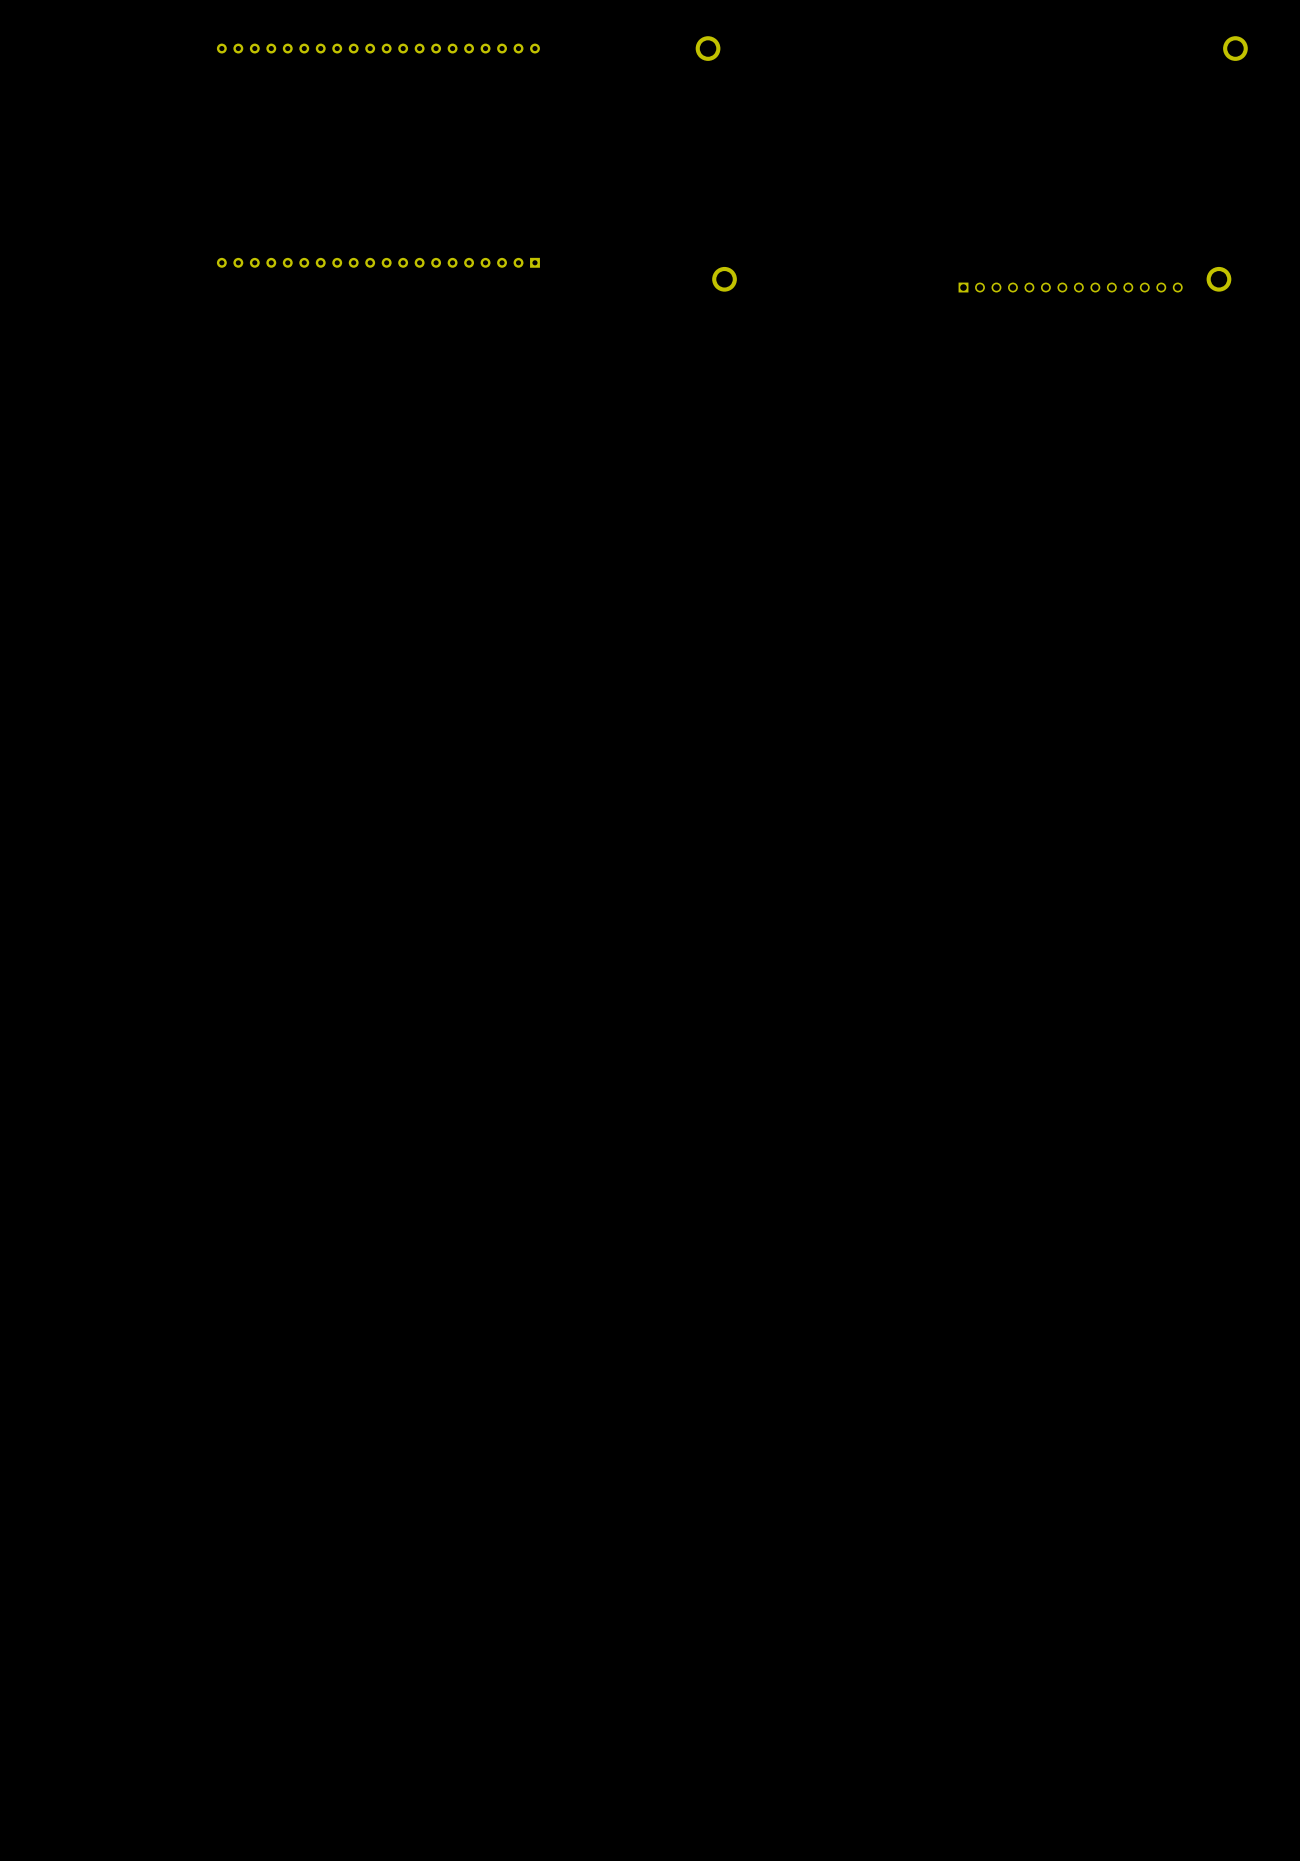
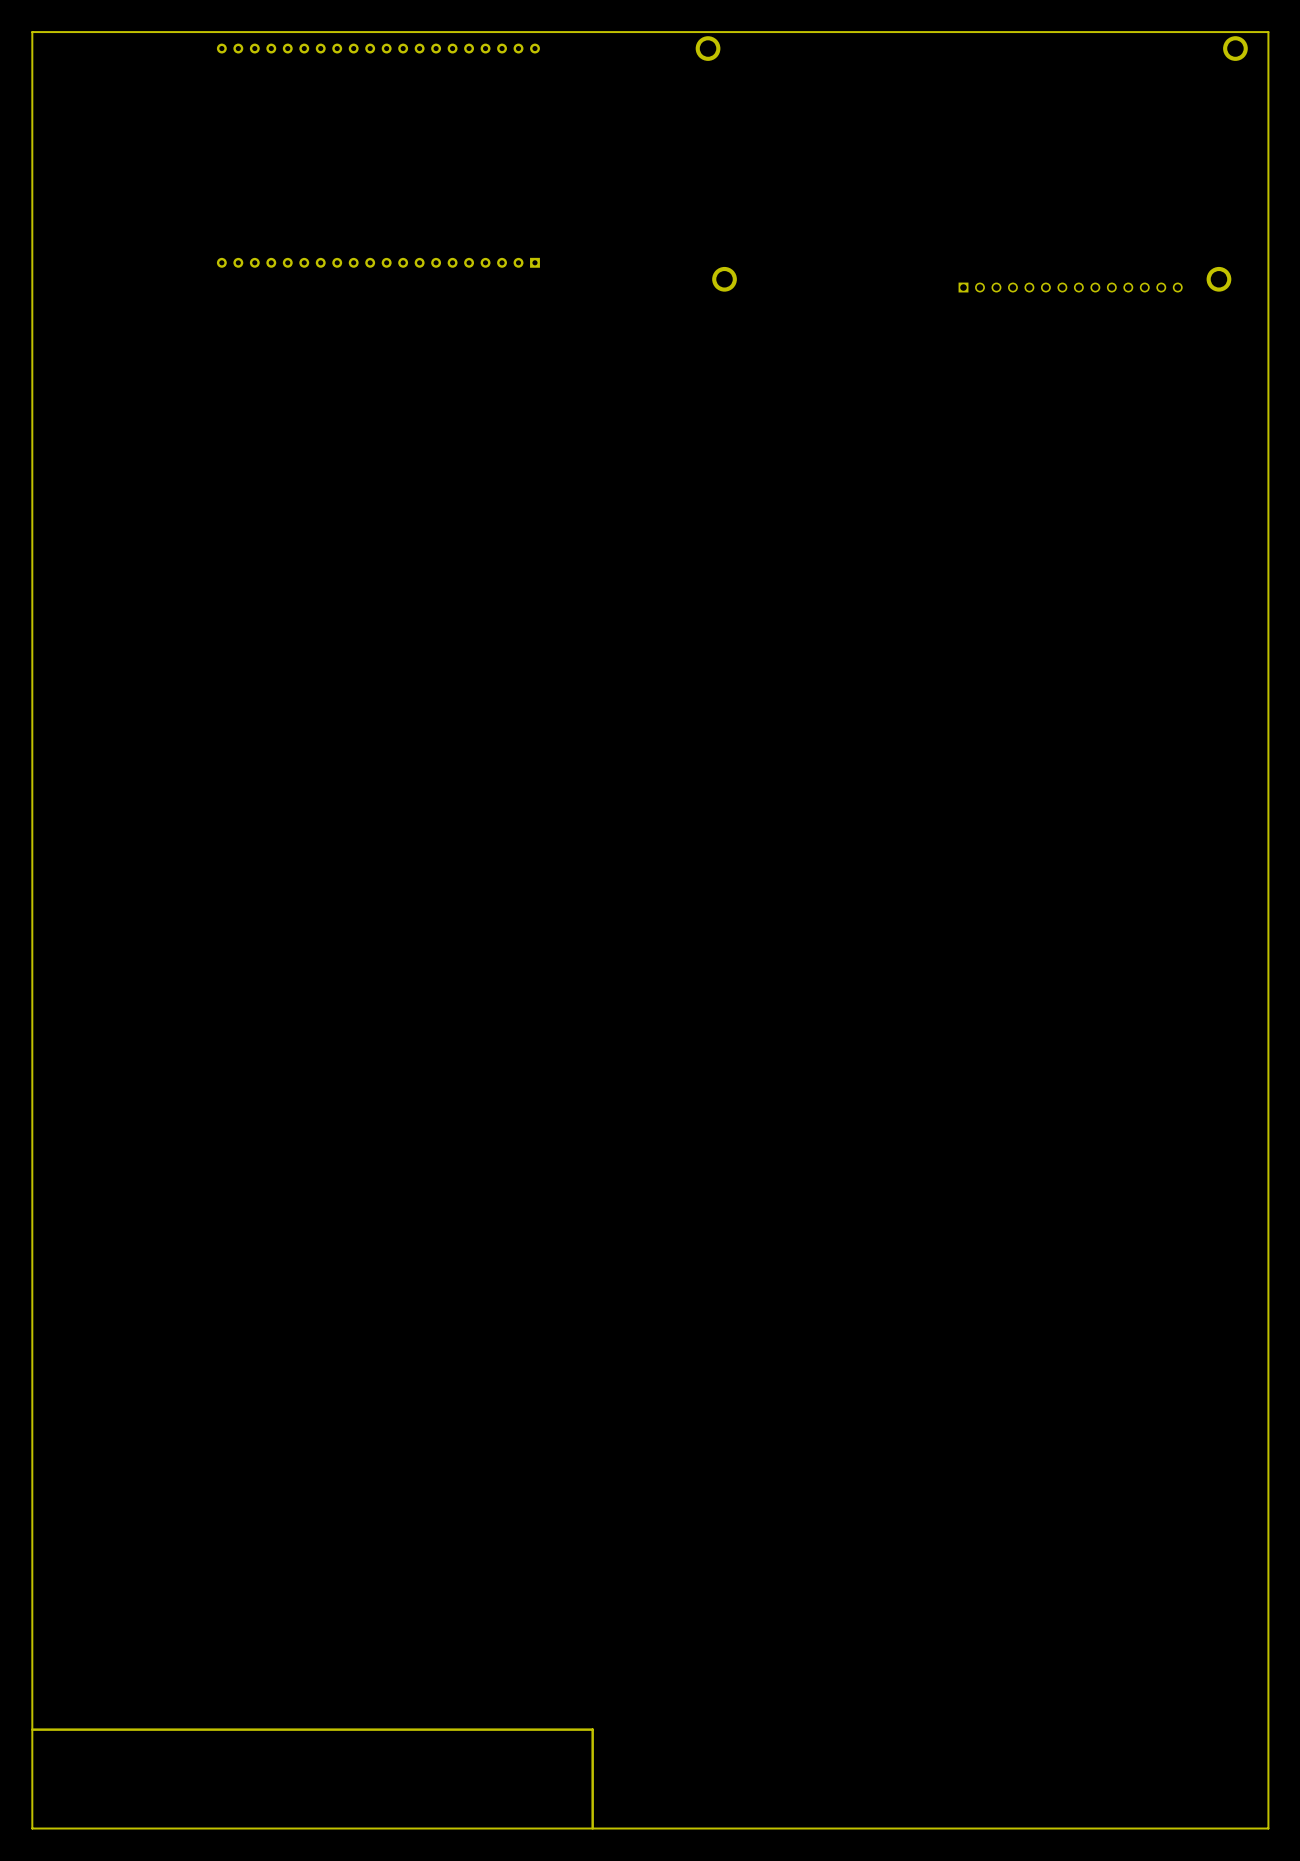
board edge: none -> (1268, 32) (32, 32) (32, 1828) (1268, 1828) (1268, 32)
board edge: none -> (32, 1729) (592, 1729) (592, 1828)

